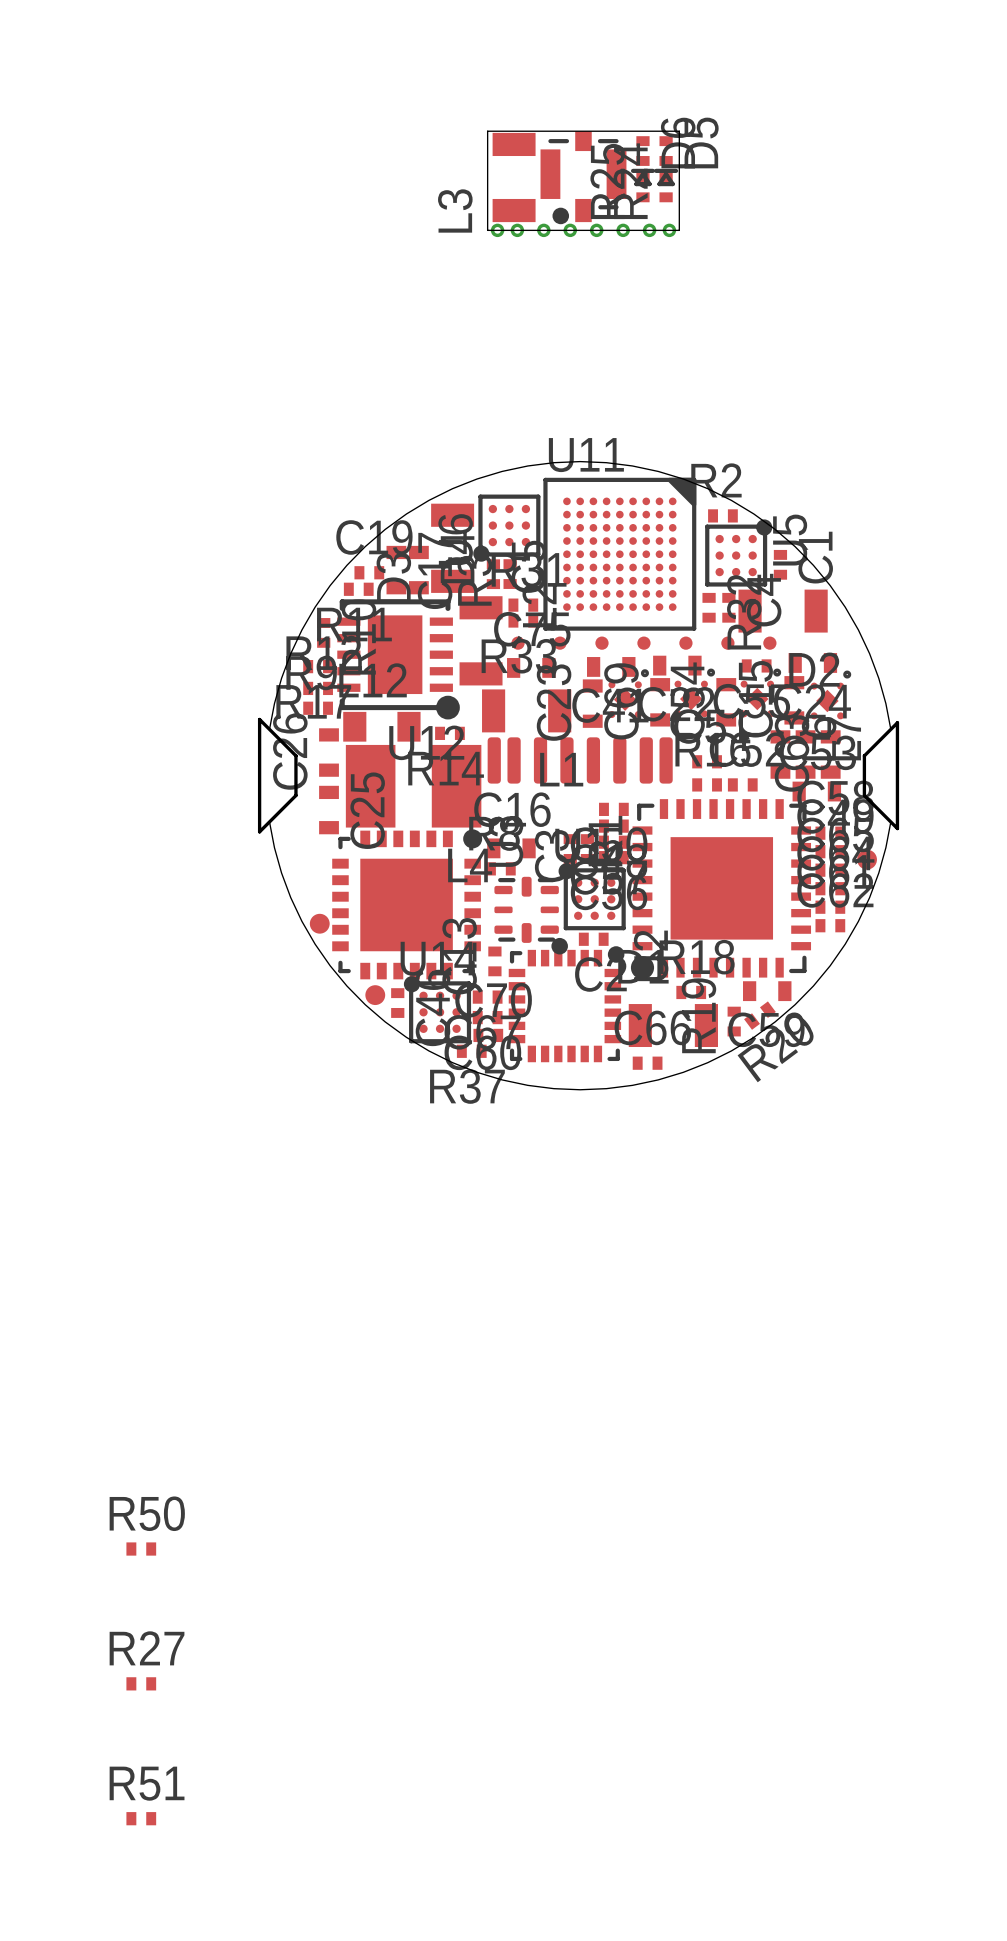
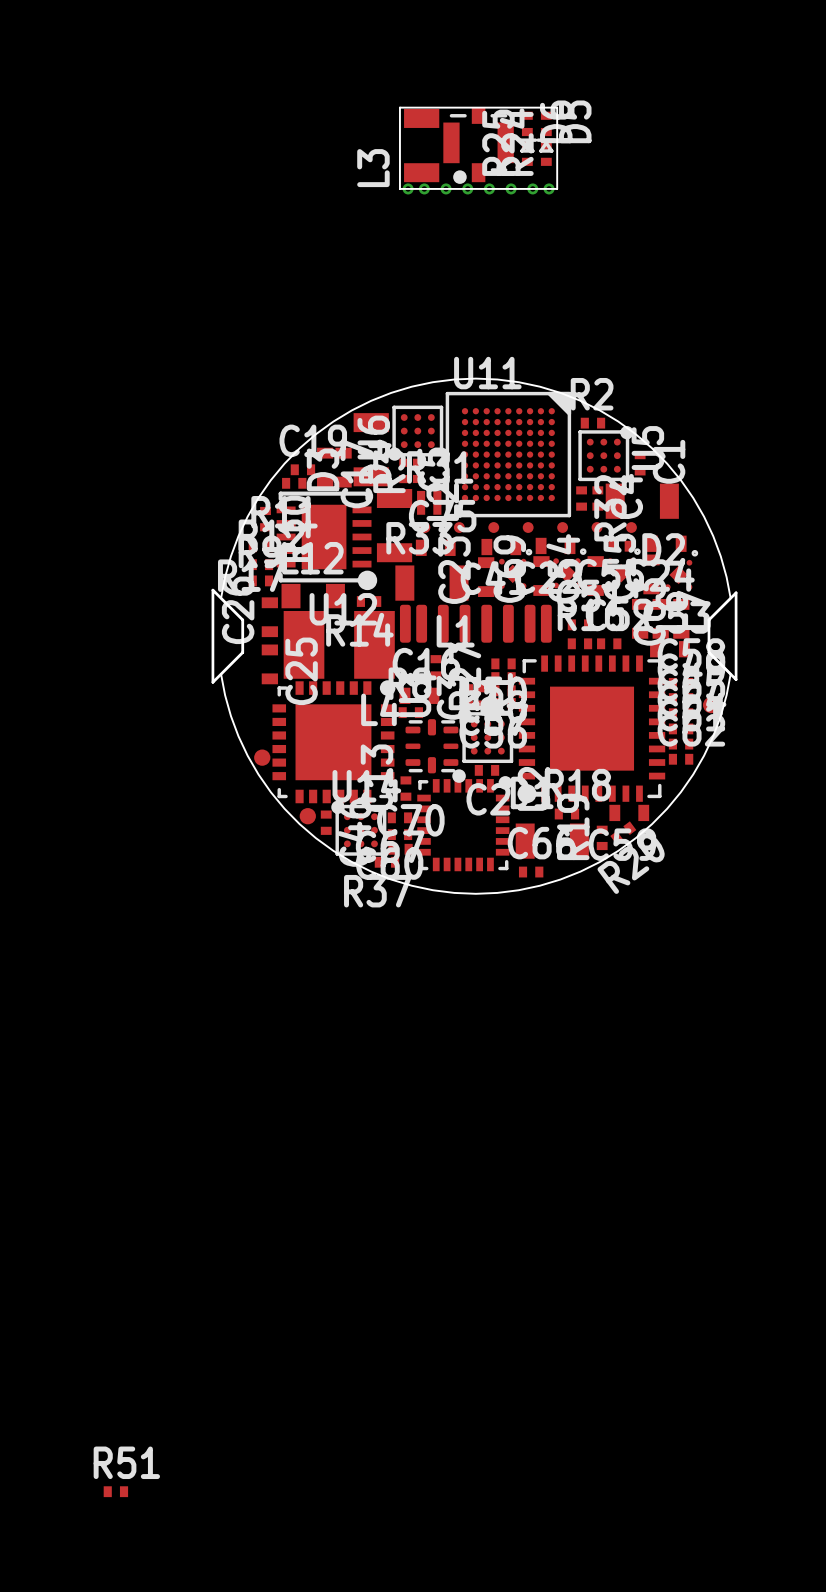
R50: (141, 1549) -> none
R27 rotation: 0° (141, 1683) -> 90° clockwise (436, 667)
R27 position: (141, 1683) -> (436, 667)

